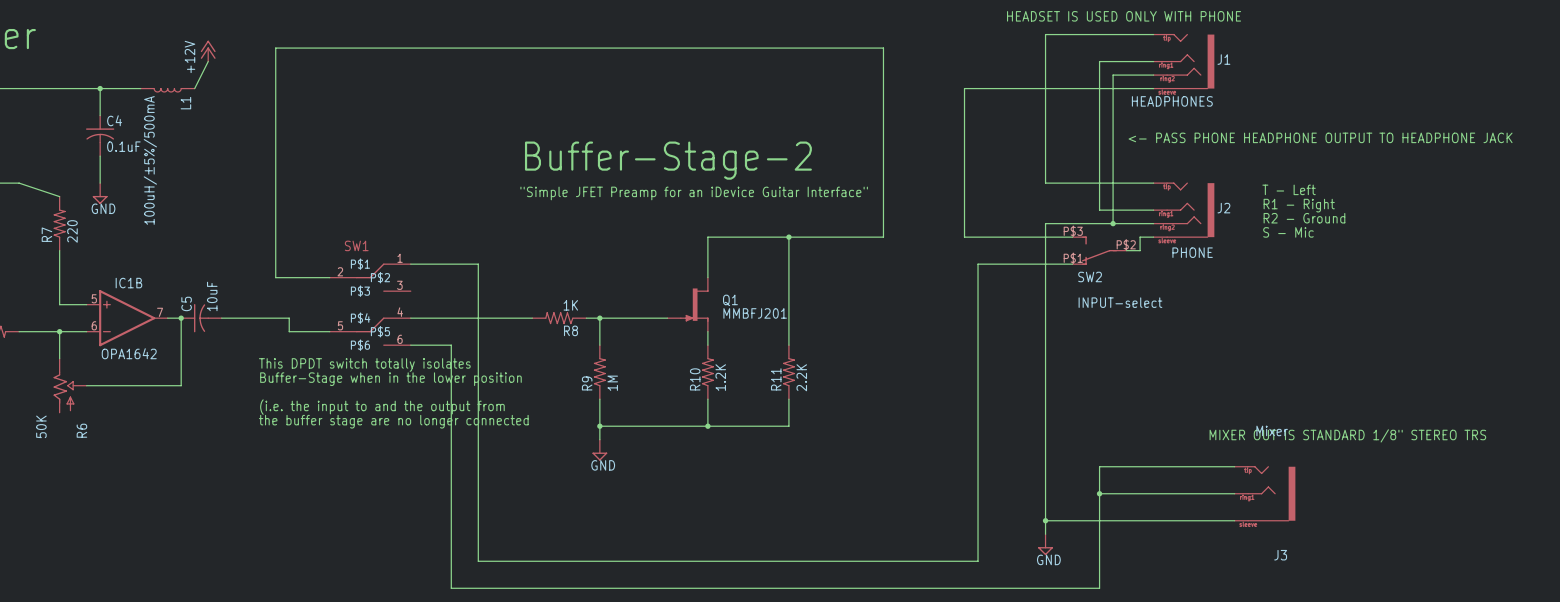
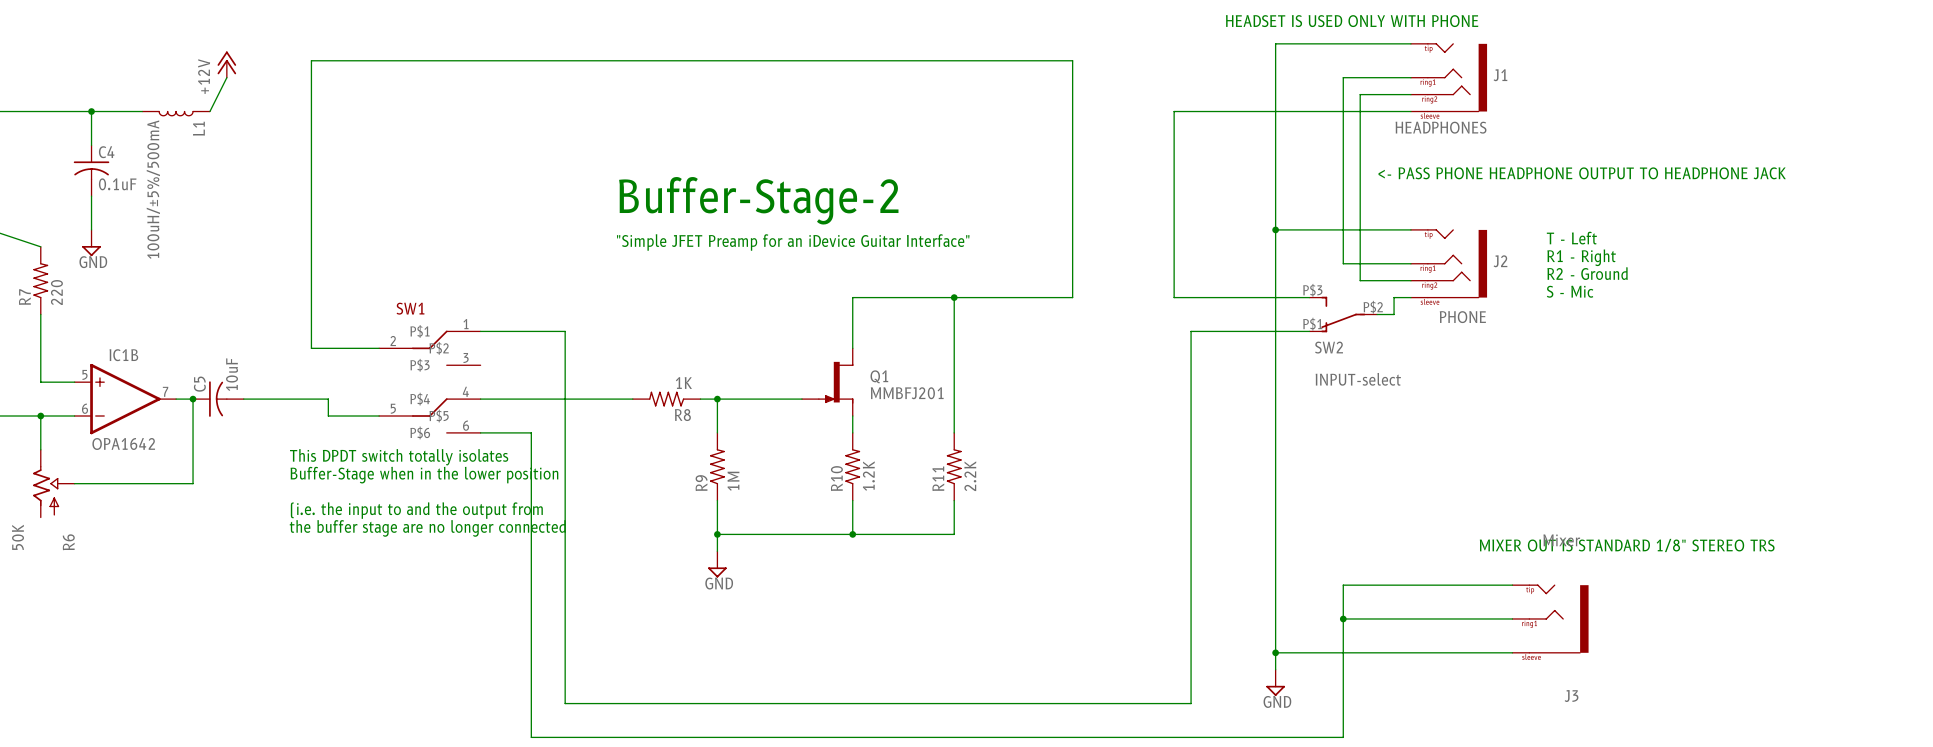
junction: none -> (1275, 229)
wire: (1045, 223) (1113, 223) -> (1275, 280) (1275, 229)
junction: (1113, 223) -> none

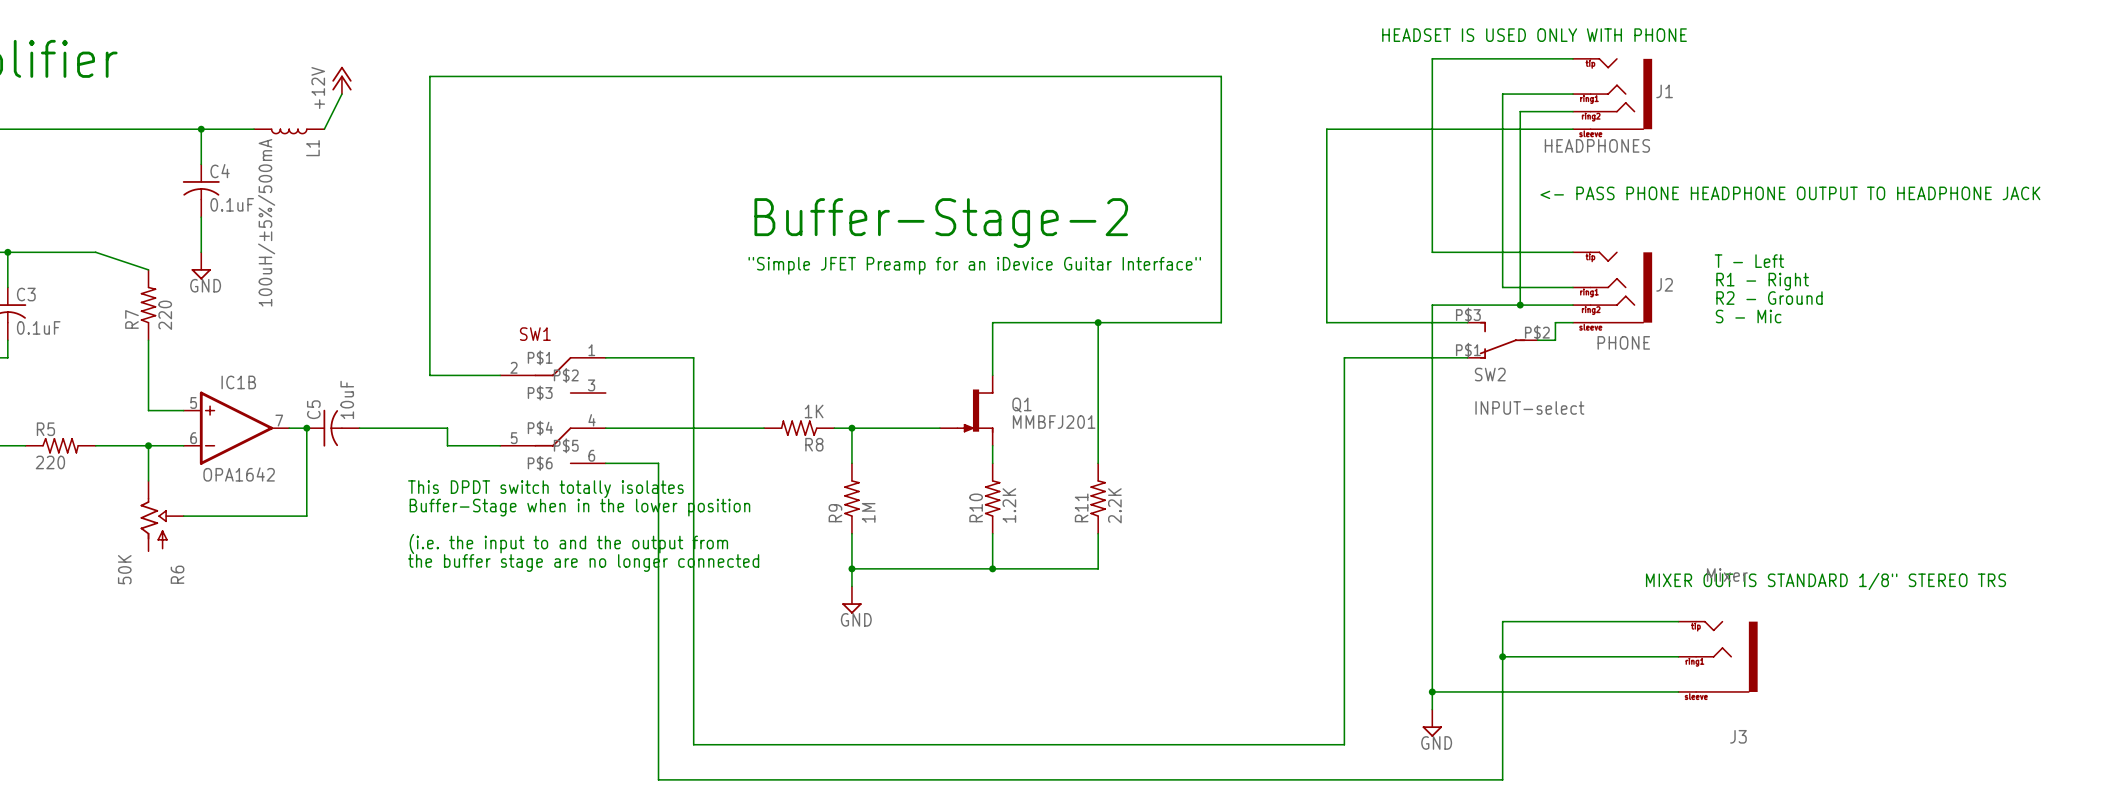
wire: (1275, 229) (1275, 280) -> (1520, 305) (1432, 305)
junction: (1275, 229) -> none
junction: none -> (1520, 305)

